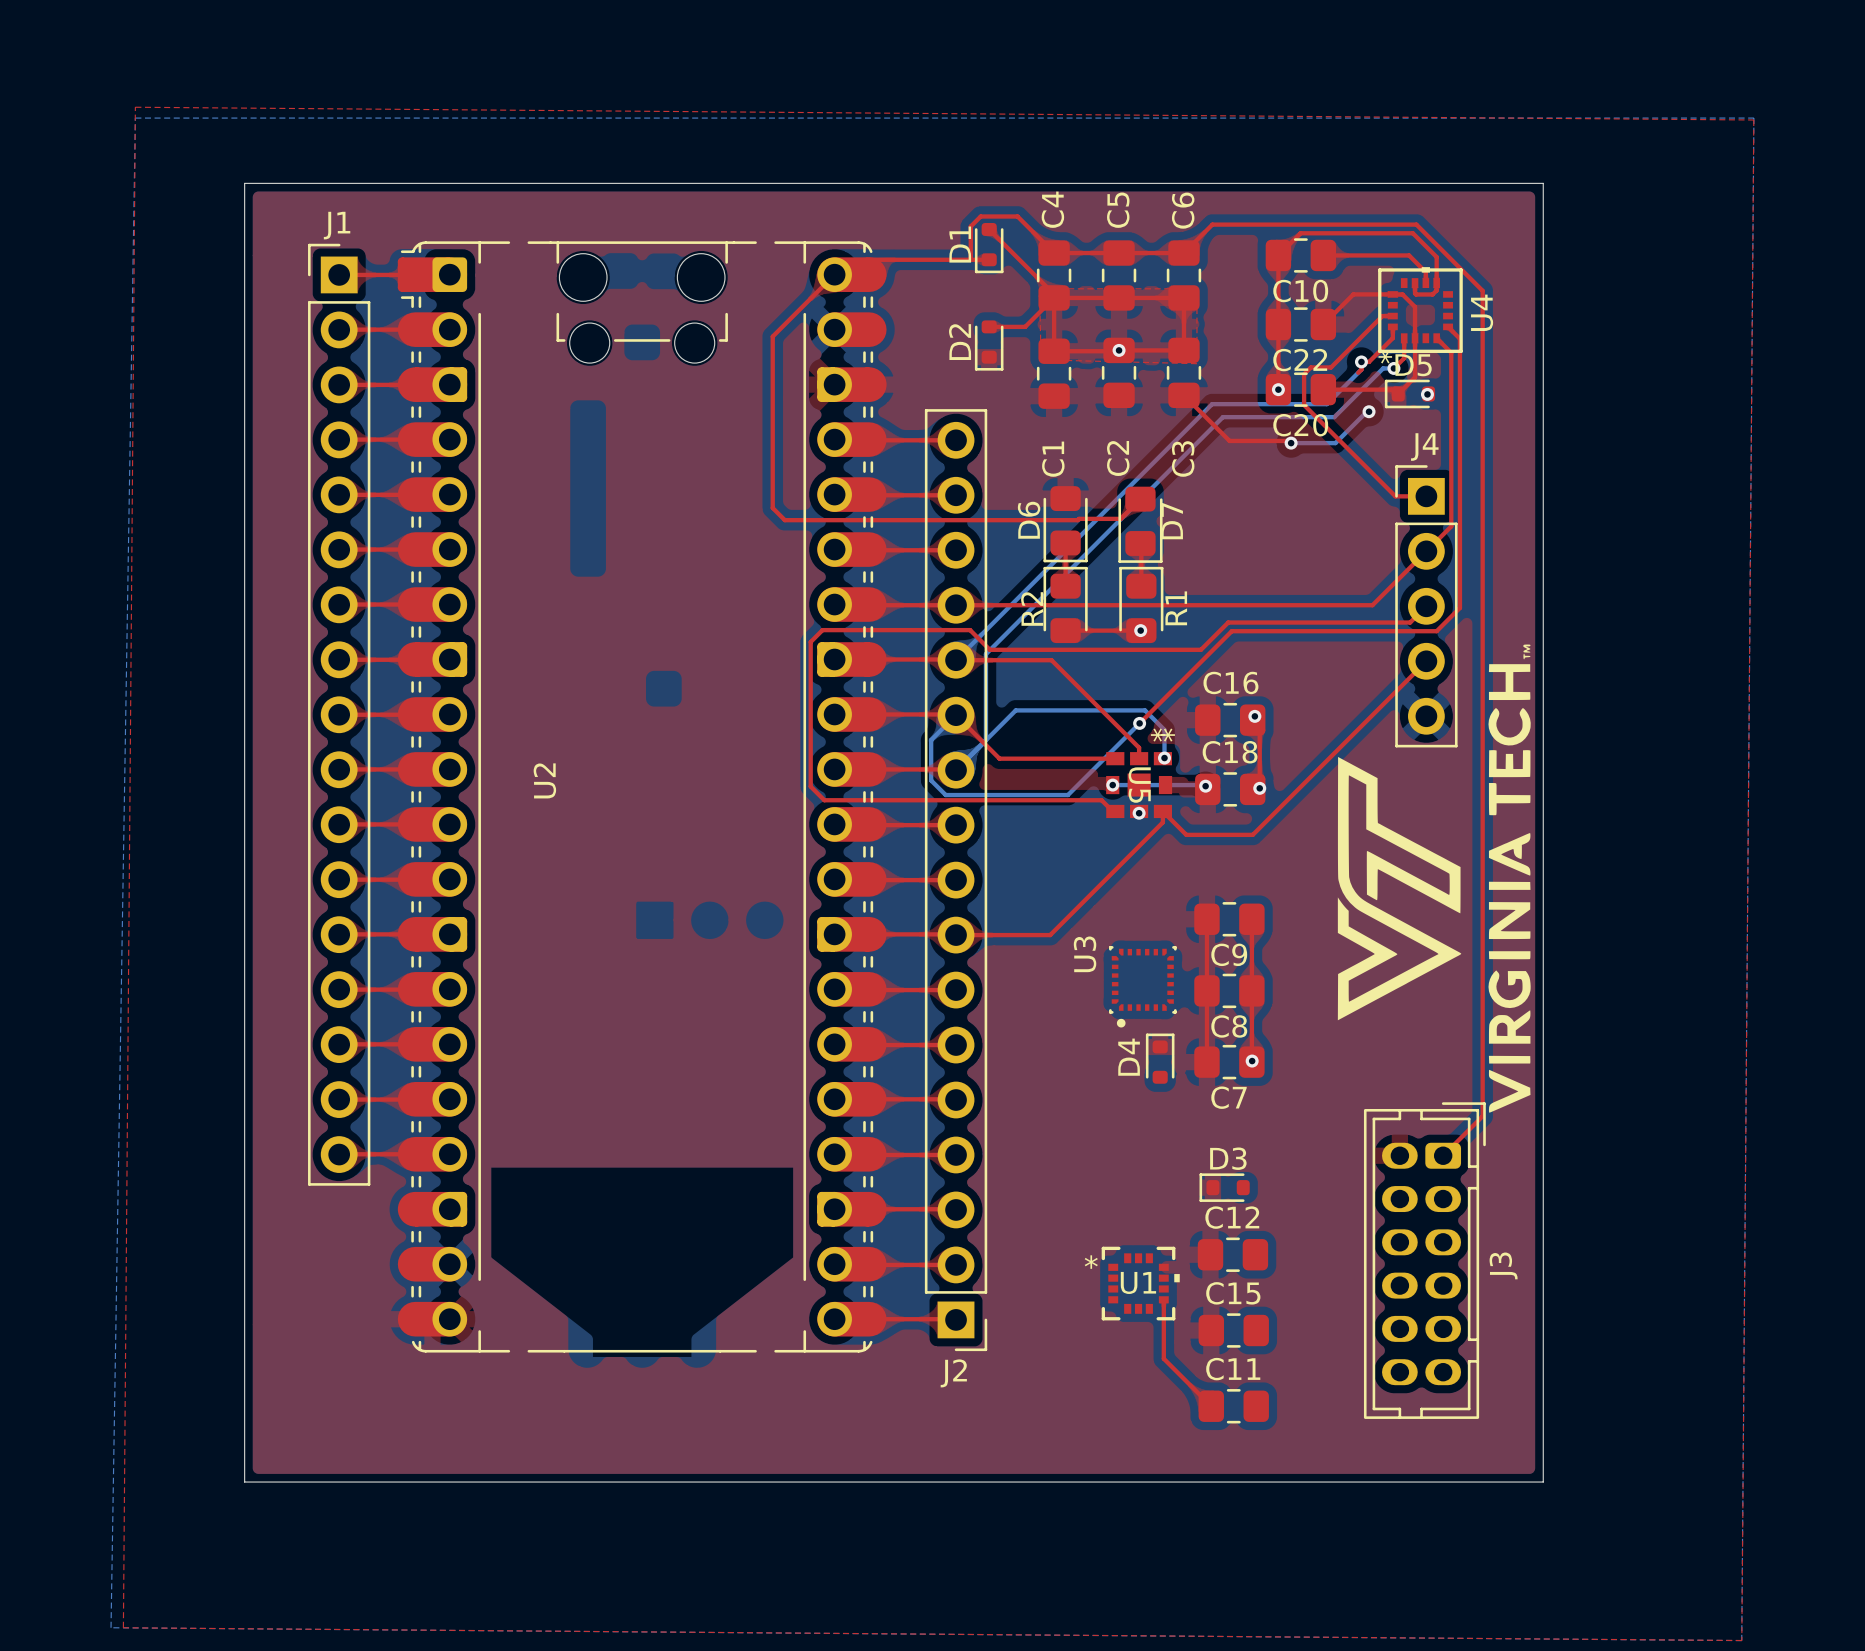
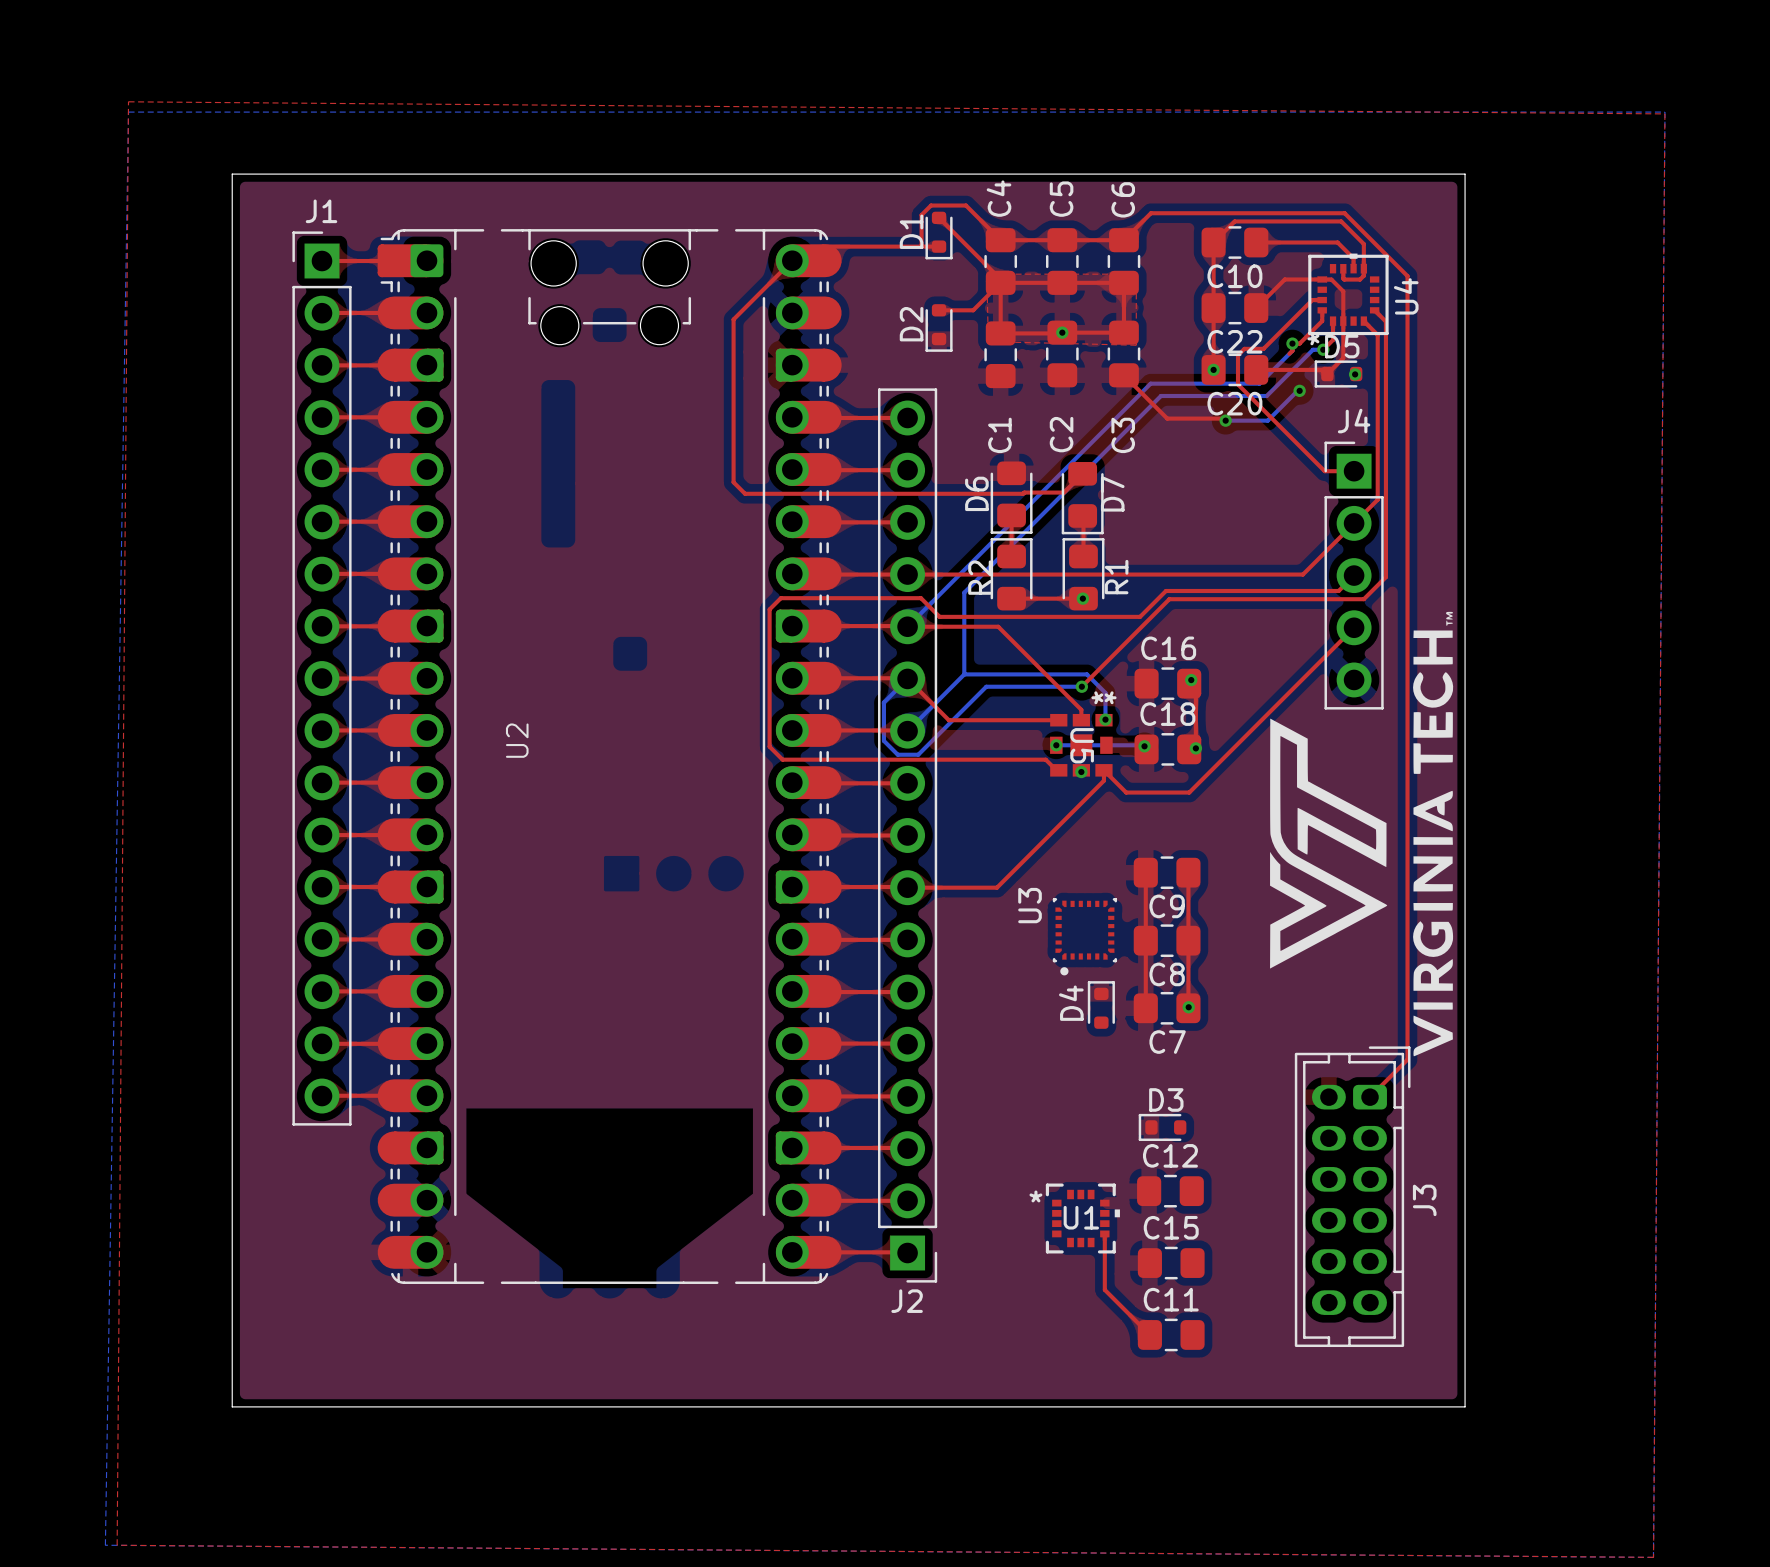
bottom track: (1015, 624) (985, 654) (985, 740) -> (964, 592) (964, 674)
bottom track: (1139, 723) (1067, 795) (967, 795) -> (1081, 686) (986, 686) (918, 754)

